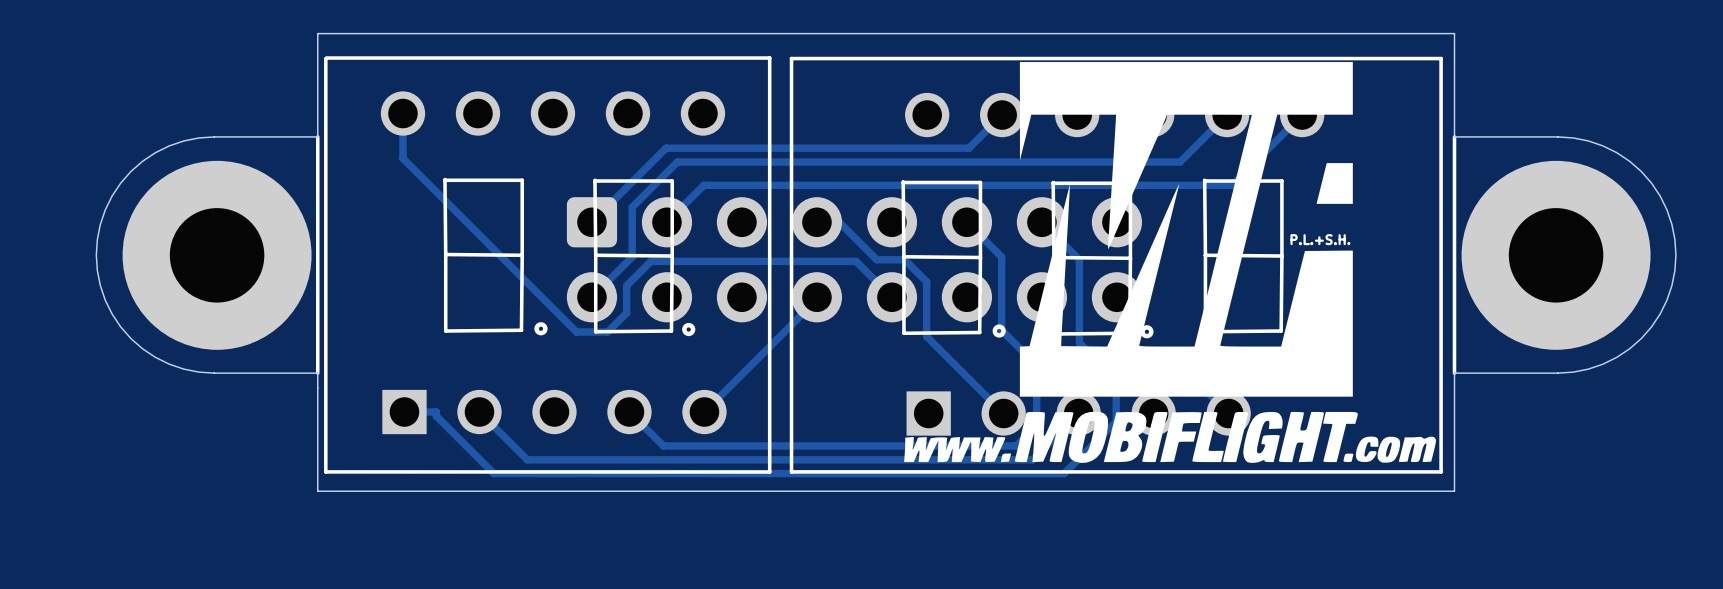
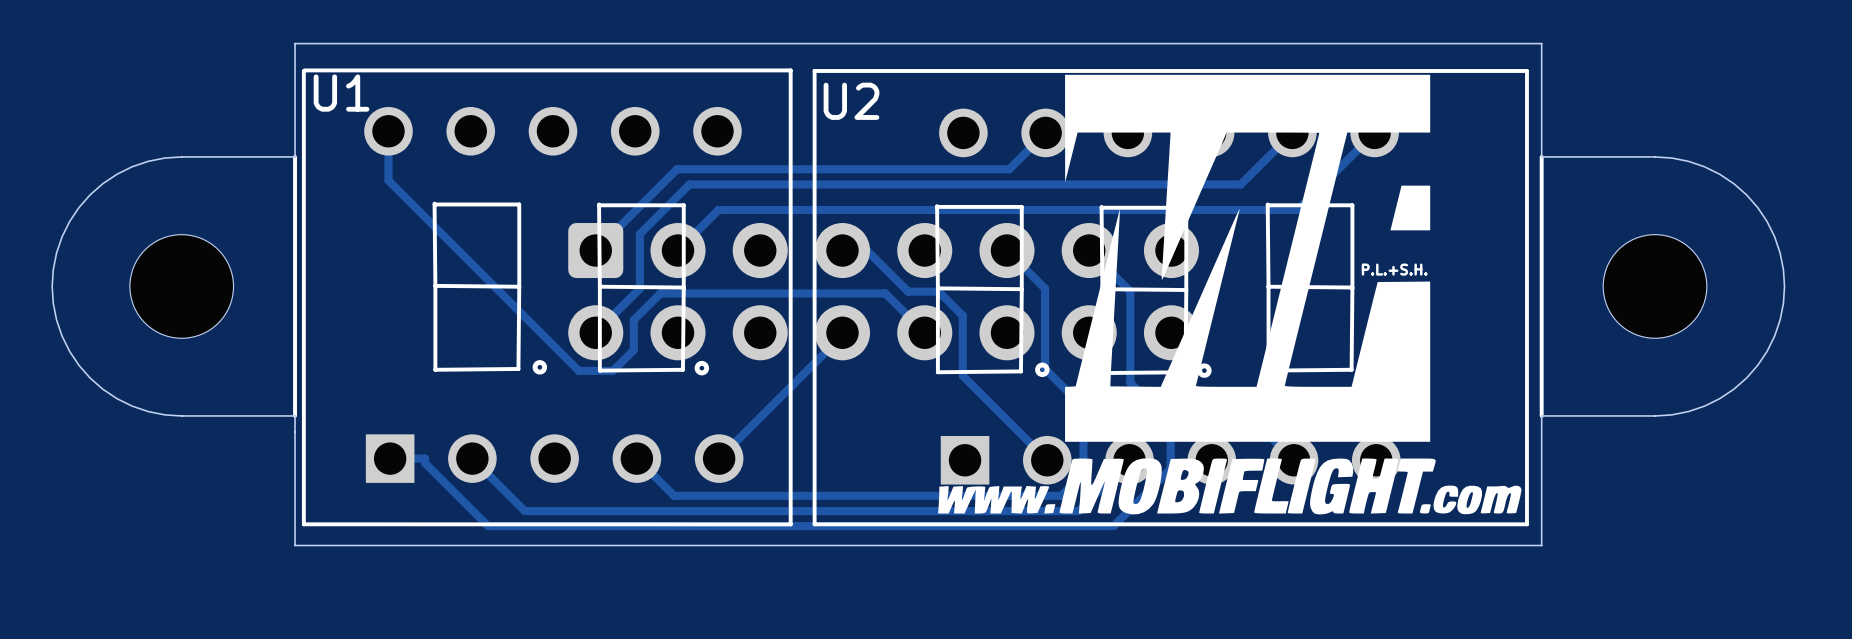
U1 name: none -> U1 (341, 93)
part footprint: [122, 160, 312, 350] -> [129, 234, 234, 339]
part footprint: [1461, 160, 1651, 350] -> [1603, 234, 1707, 339]
U2: none -> (1170, 297)

